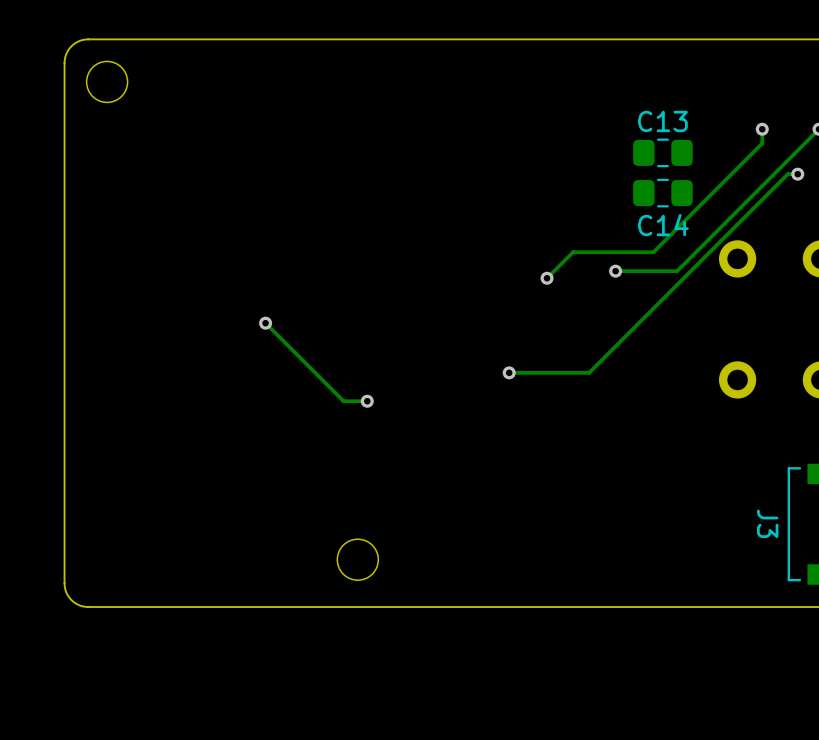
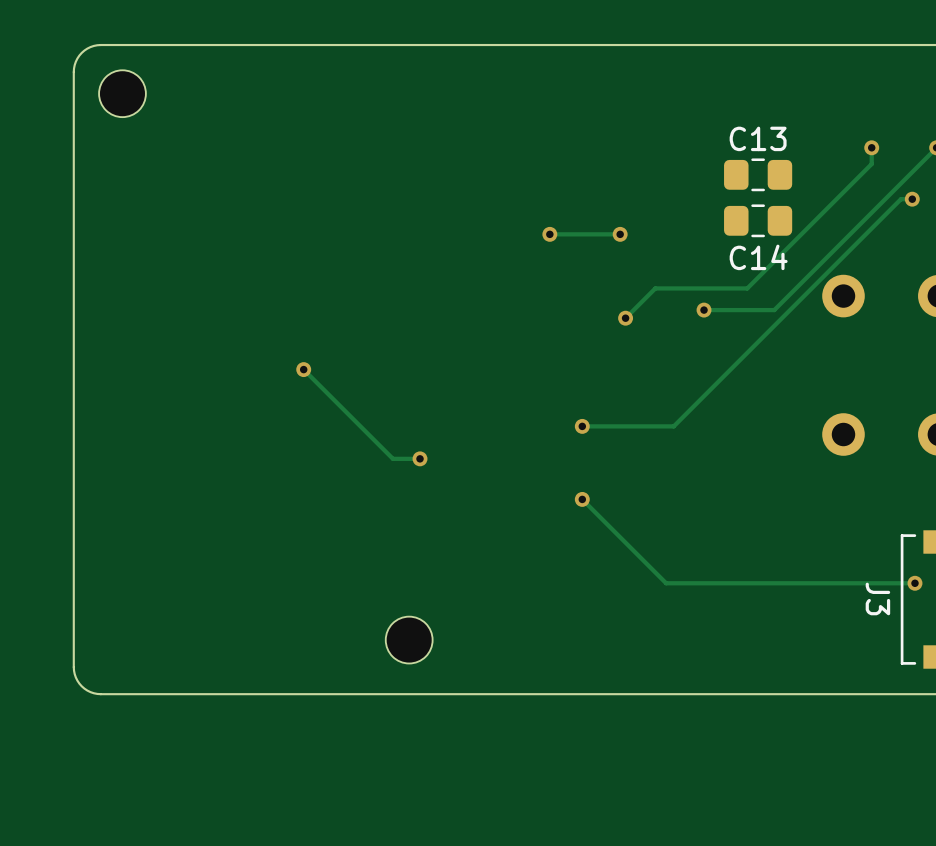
via: none -> (549, 234)
track: none -> (620, 234) (549, 234)
via: none -> (620, 234)
track: none -> (582, 499) (666, 583) (914, 583)
via: none -> (582, 499)
via: none -> (914, 583)

